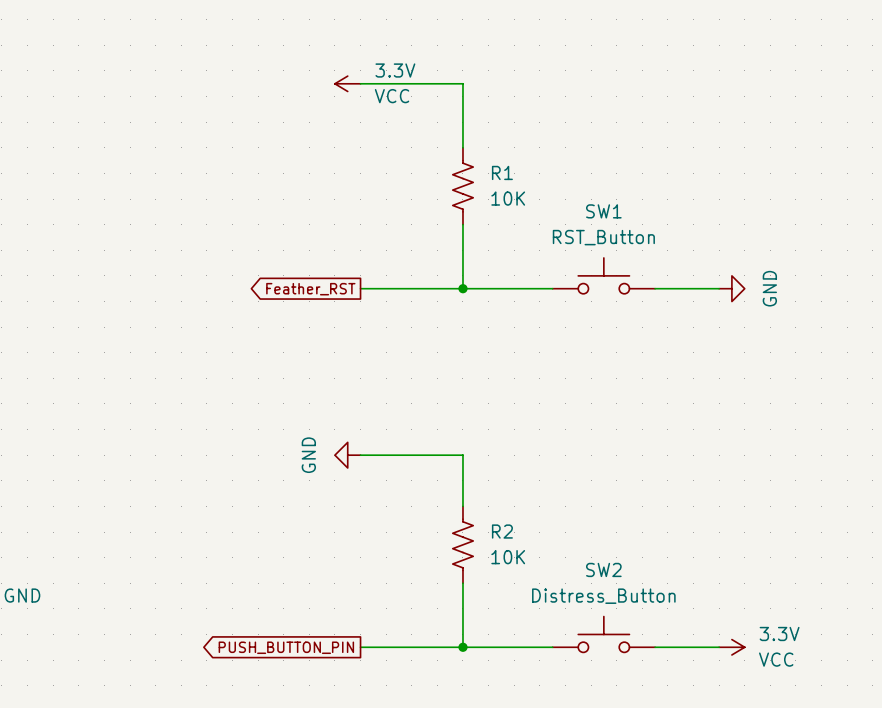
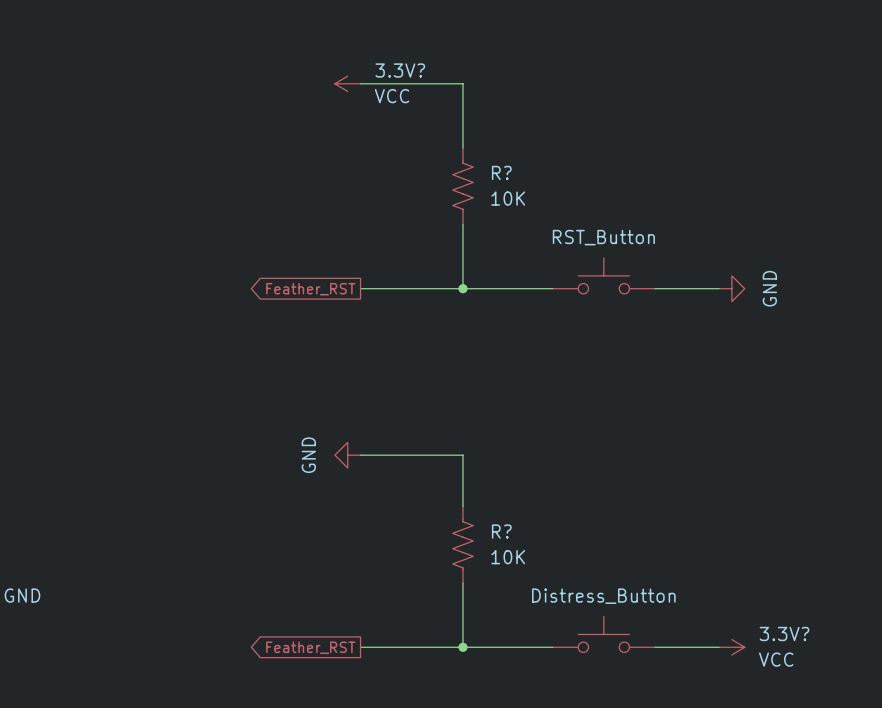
3.3V name: 3.3V (395, 70) -> 3.3V? (400, 70)
R1 name: R1 (502, 172) -> R? (501, 172)
SW1 name: SW1 (603, 211) -> none
R2 name: R2 (502, 531) -> R? (501, 531)
SW2 name: SW2 (603, 569) -> none
3.3V name: 3.3V (779, 633) -> 3.3V? (784, 633)
global label: PUSH_BUTTON_PIN (286, 647) -> Feather_RST (310, 647)

